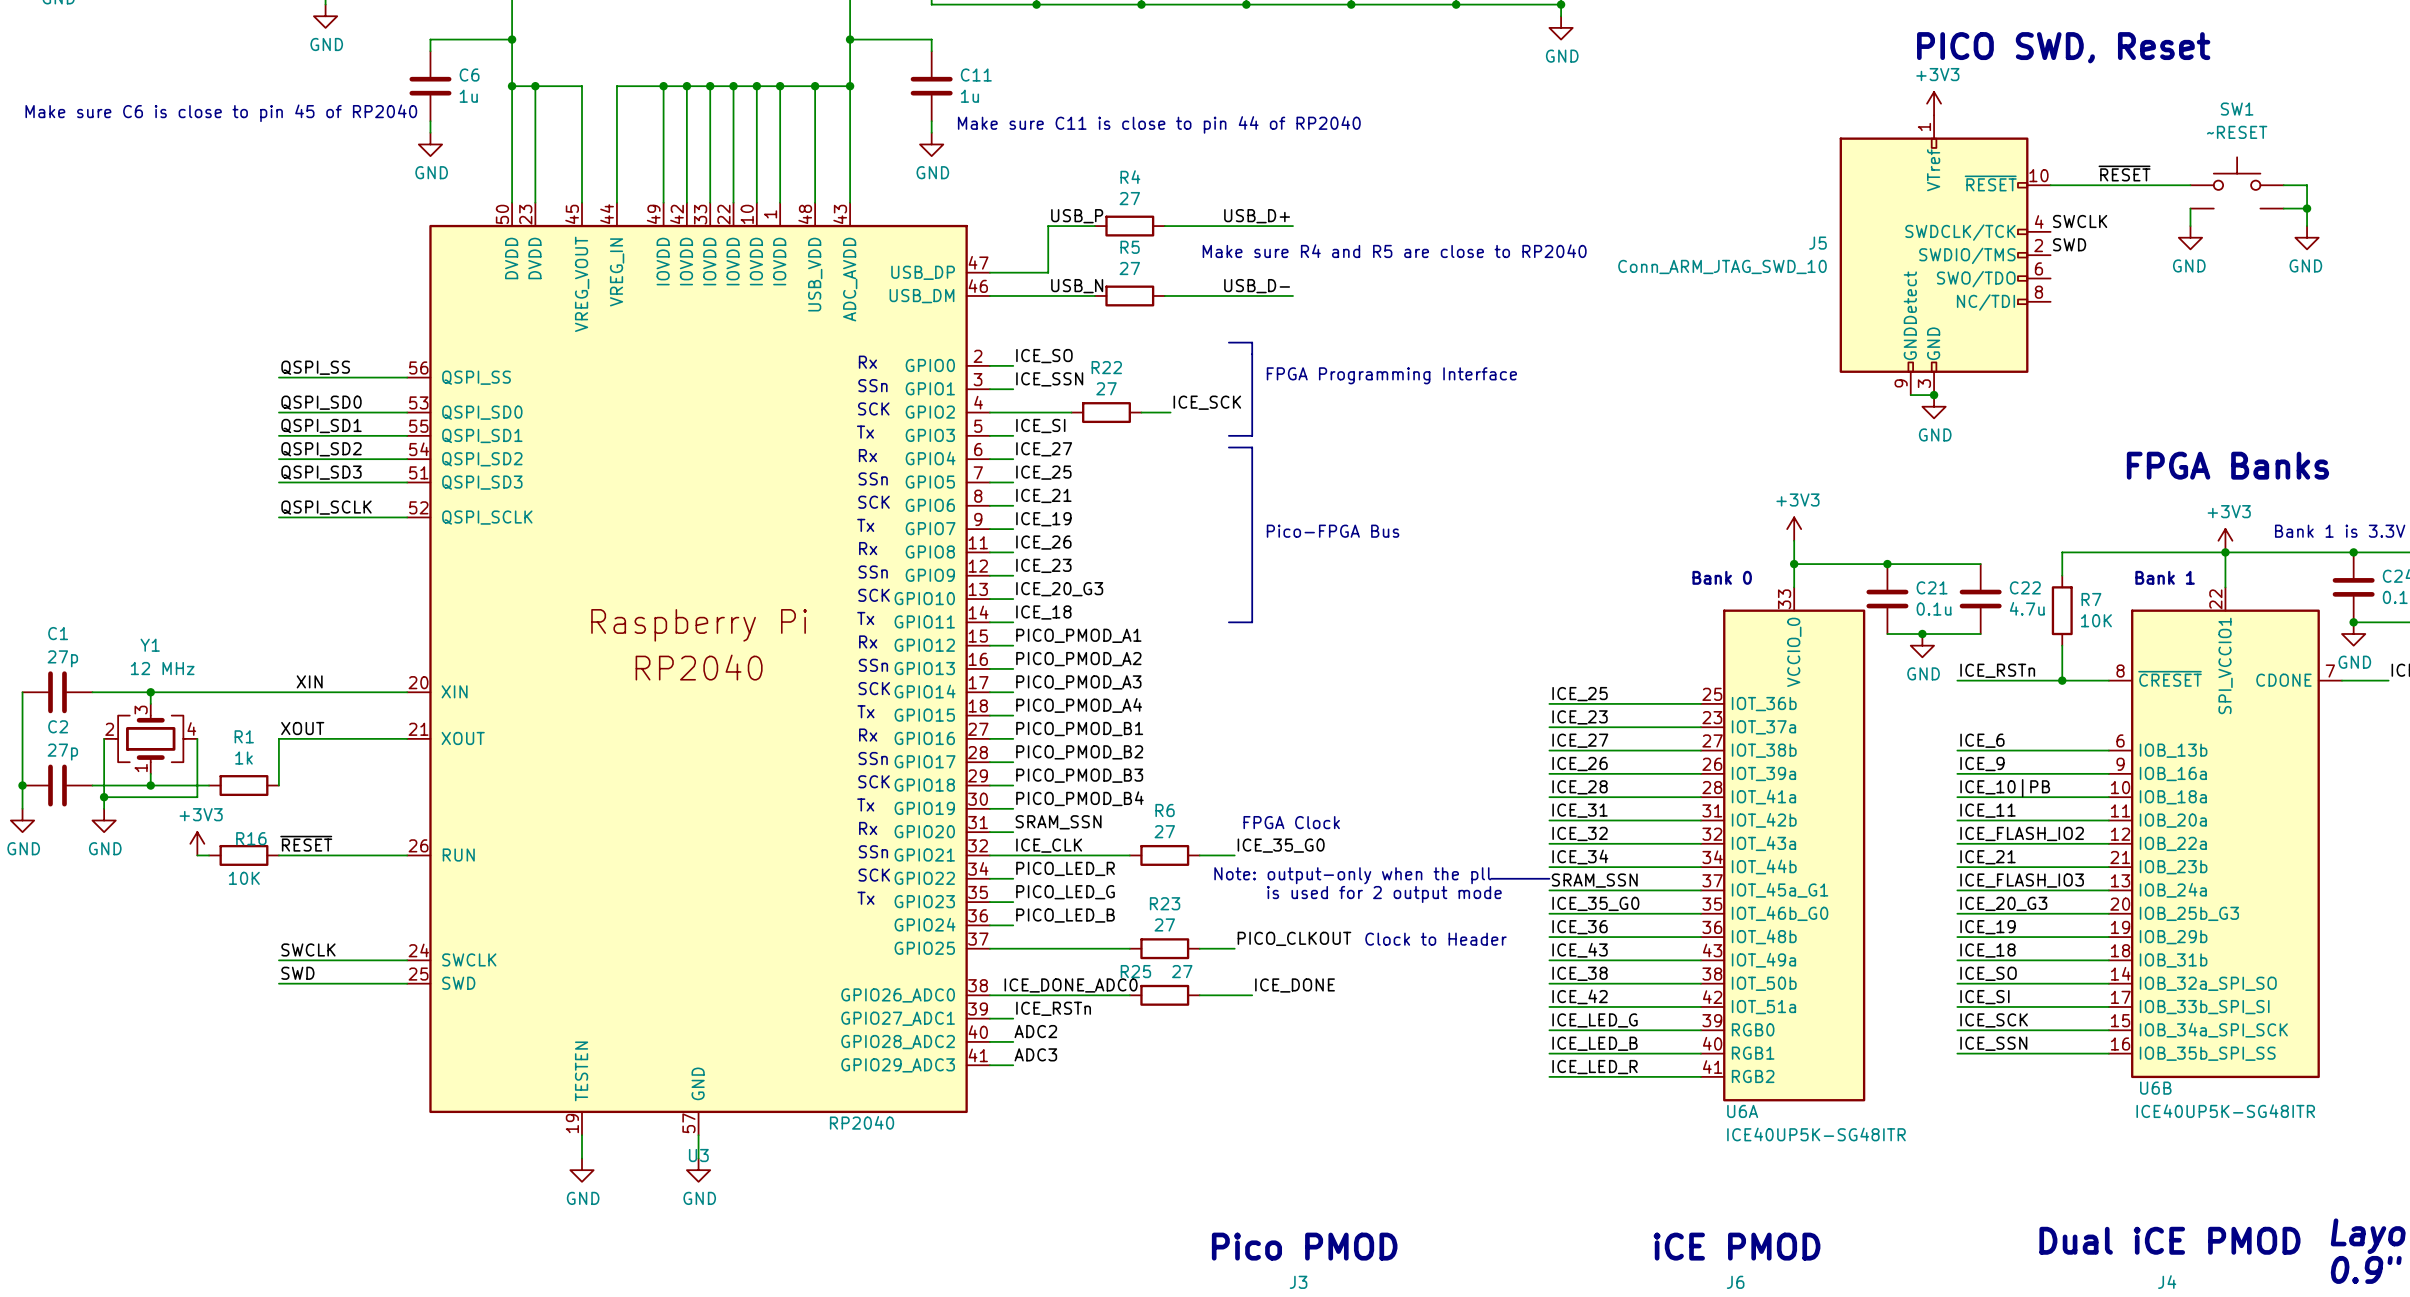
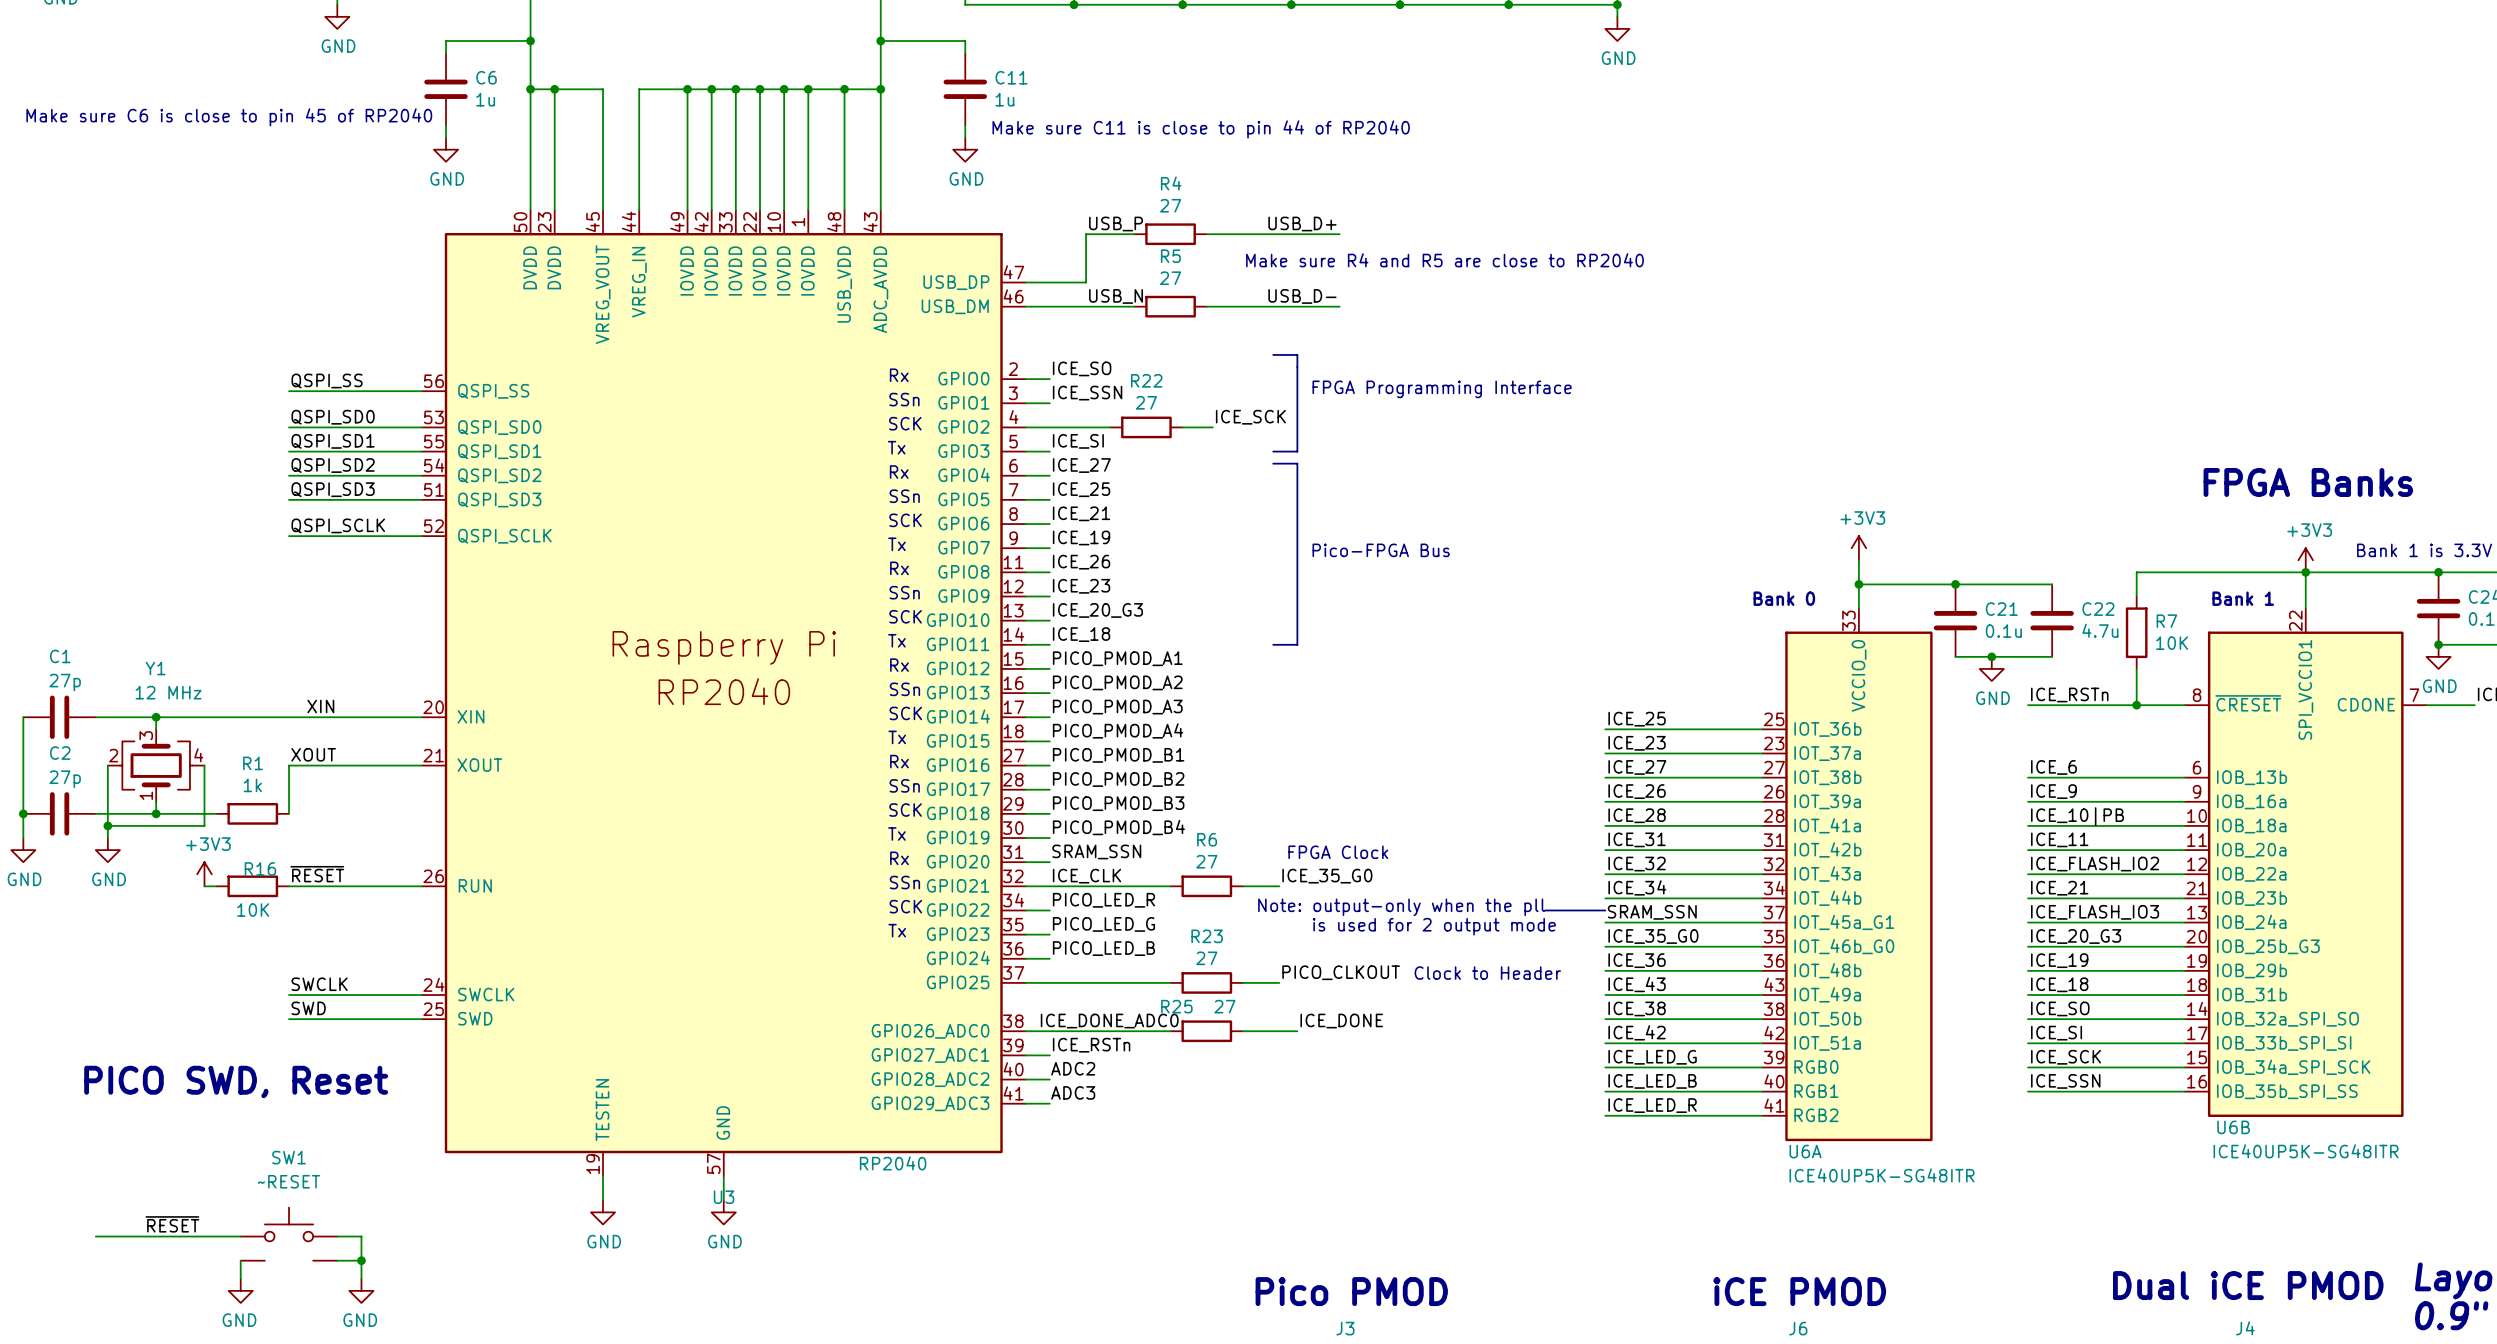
text: PICO SWD, Reset (2063, 47) -> none
power symbol: +3V3 (1934, 103) -> none
label: ~{RESET} (2124, 173) -> none
SW1 position: (2237, 182) -> (289, 1234)
wire: (2050, 185) (2190, 185) -> none
wire: (2283, 185) (2307, 185) (2307, 226) -> none
wire: (2190, 208) (2190, 226) -> none
wire: (2283, 208) (2307, 208) -> none
junction: (2307, 208) -> none
label: SWCLK (2080, 221) -> none
power symbol: GND (2190, 237) -> none
power symbol: GND (2307, 237) -> none
label: SWD (2069, 244) -> none
J5: Conn_ARM_JTAG_SWD_10 (1945, 255) -> none
wire: (1910, 395) (1934, 395) -> none
junction: (1934, 395) -> none
power symbol: GND (1934, 406) -> none
text: none -> PICO SWD, Reset (236, 1081)
label: none -> ~{RESET} (172, 1224)
wire: none -> (95, 1236) (240, 1236)
wire: none -> (337, 1236) (361, 1236) (361, 1278)
wire: none -> (240, 1260) (240, 1278)
wire: none -> (337, 1260) (361, 1260)
junction: none -> (361, 1260)
power symbol: none -> GND (240, 1290)
power symbol: none -> GND (361, 1290)

